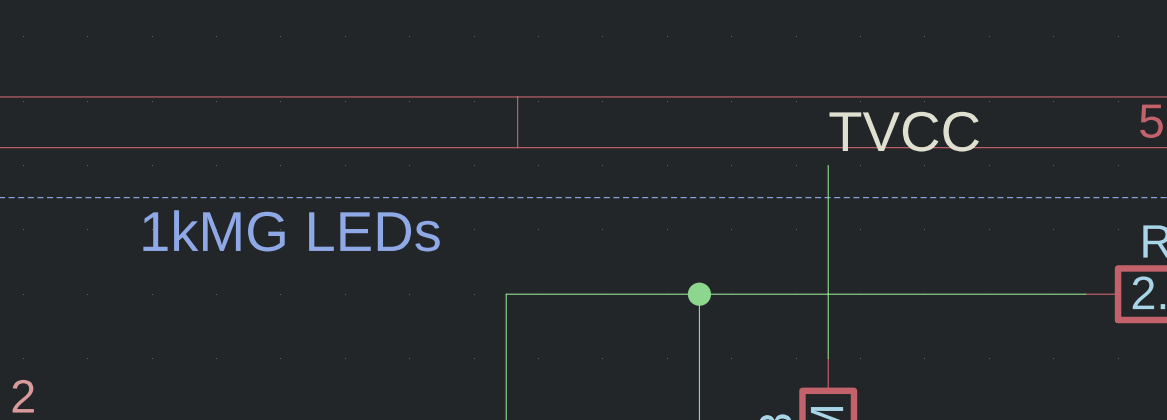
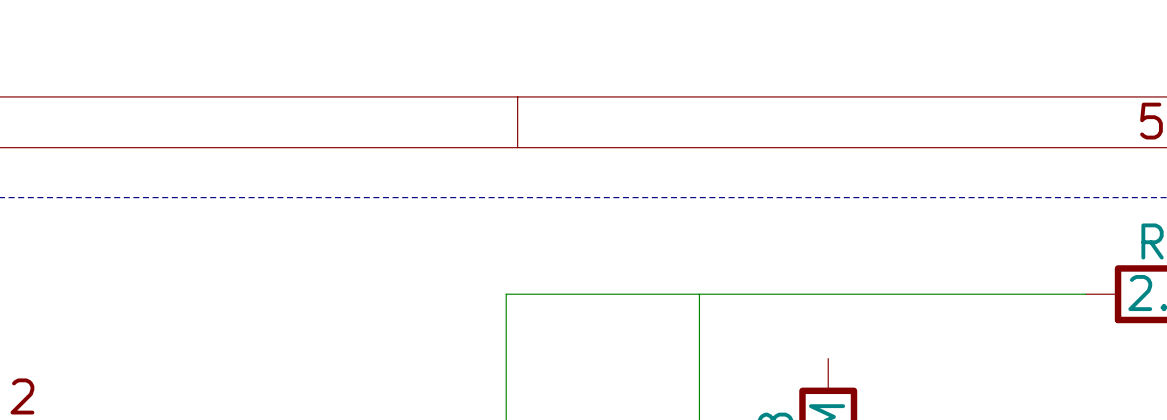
label: TVCC (904, 131) -> none
wire: (828, 165) (828, 358) -> none
text: 1kMG LEDs (291, 230) -> none
junction: (699, 294) -> none

